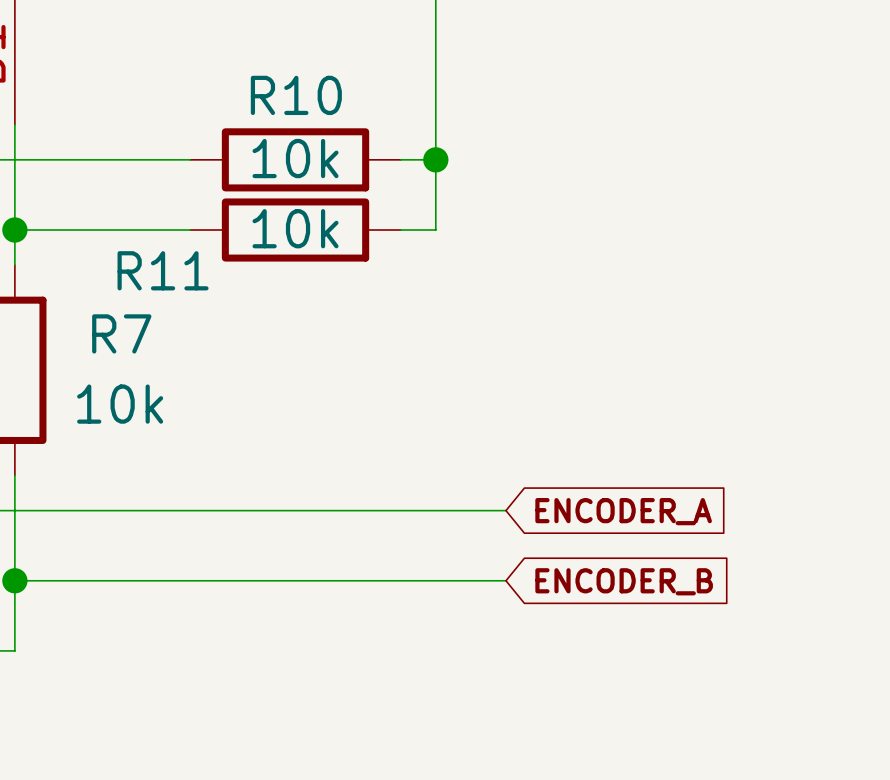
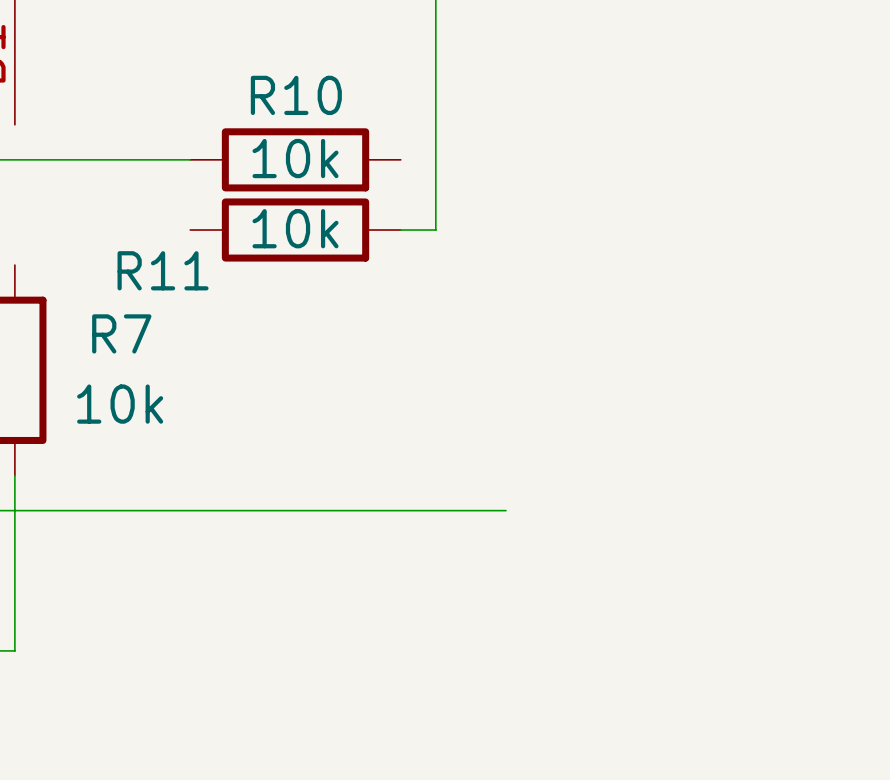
wire: (14, 124) (14, 265) -> none
wire: (400, 159) (435, 159) -> none
junction: (435, 159) -> none
wire: (14, 230) (190, 230) -> none
junction: (14, 230) -> none
global label: ENCODER_A (623, 511) -> none
wire: (14, 580) (505, 580) -> none
junction: (14, 580) -> none
global label: ENCODER_B (624, 581) -> none

